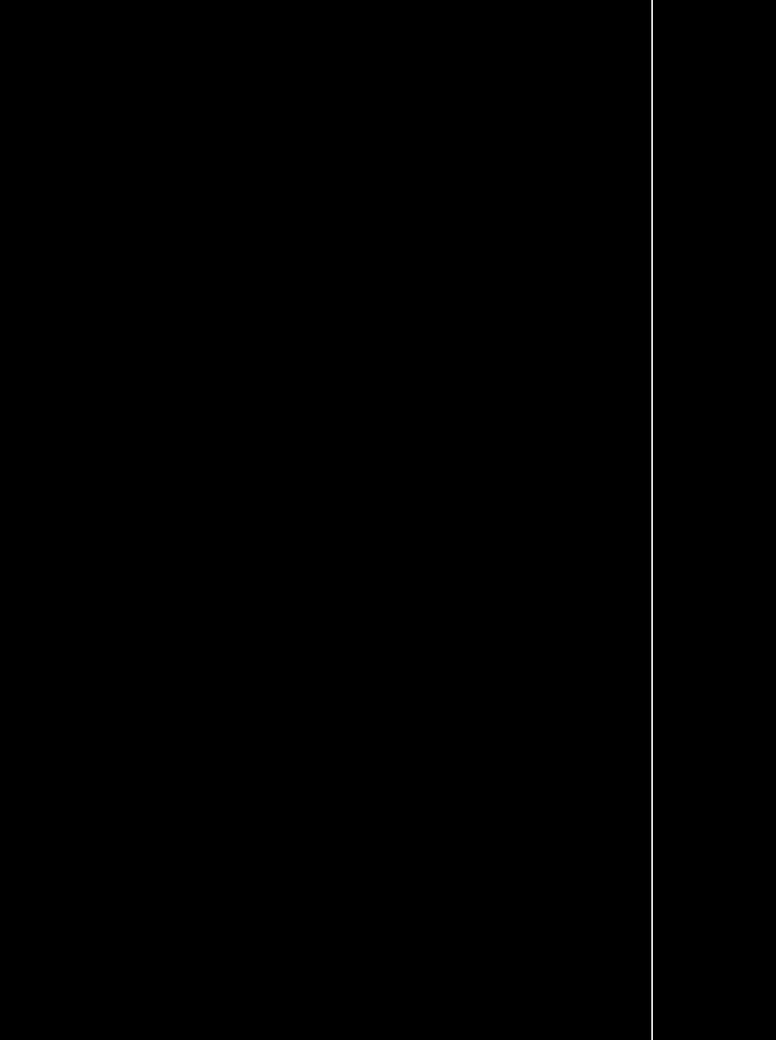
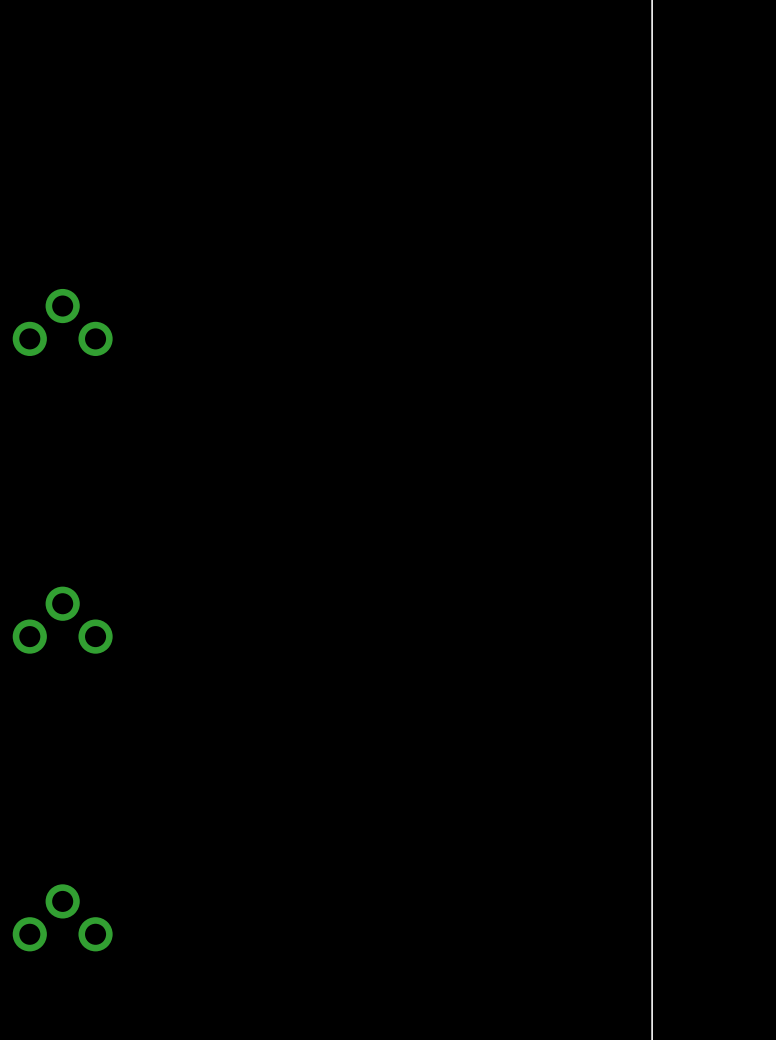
part: none -> (62, 322)
part: none -> (62, 620)
part: none -> (62, 917)

